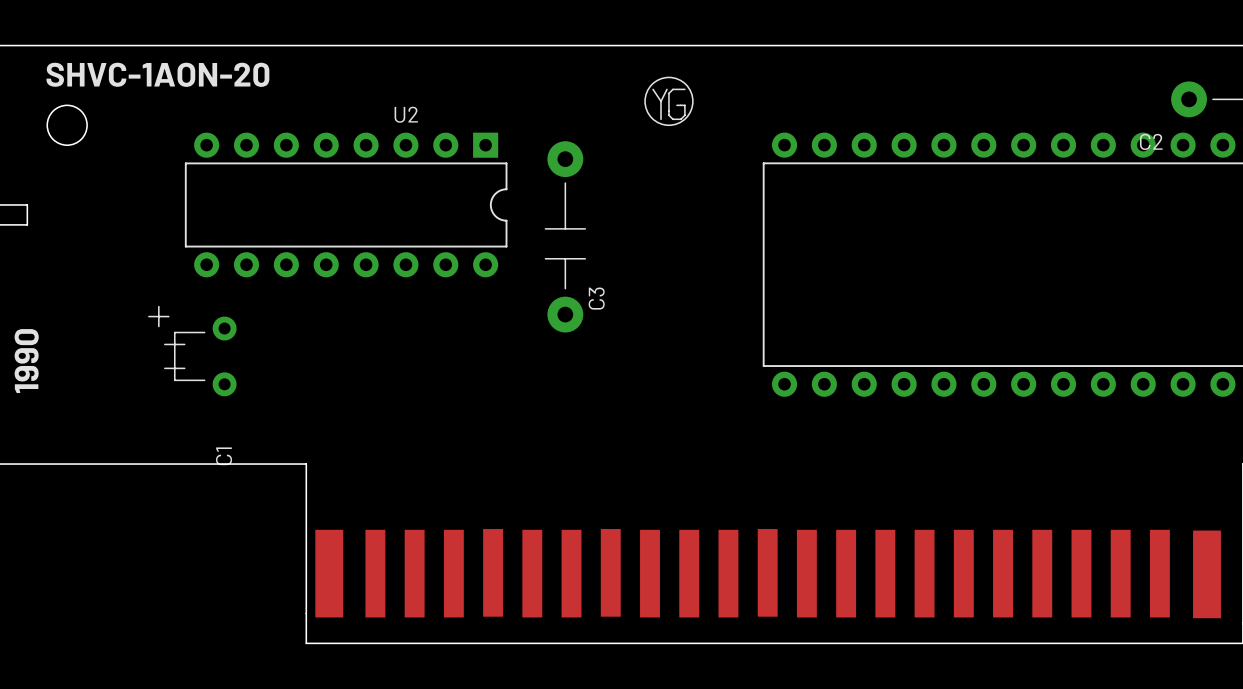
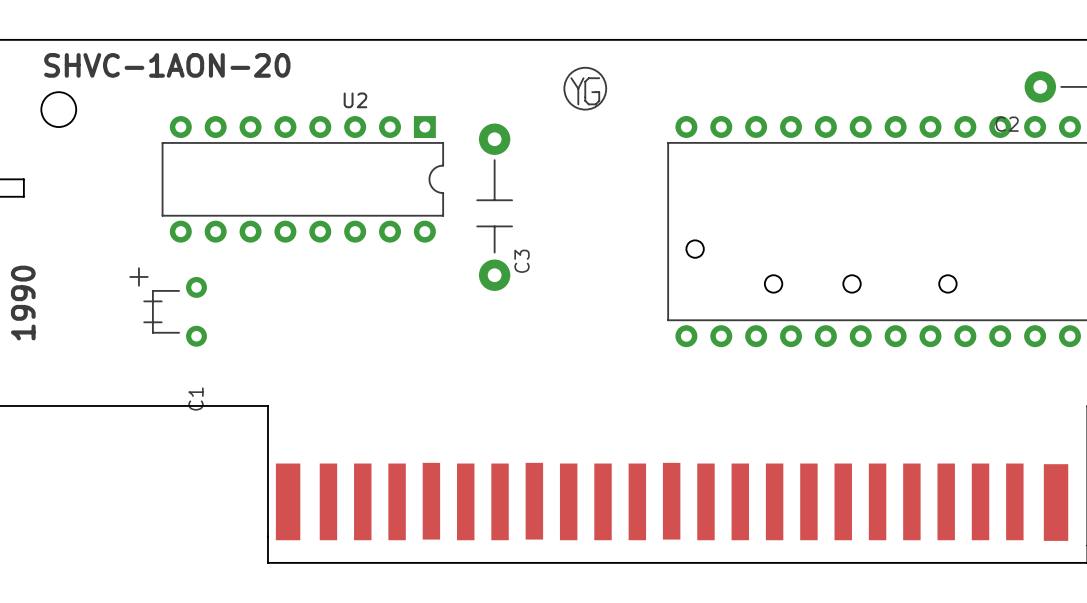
round board edge: none -> [685, 239, 705, 259]
round board edge: none -> [764, 274, 783, 294]
round board edge: none -> [842, 274, 862, 294]
round board edge: none -> [938, 274, 958, 294]

